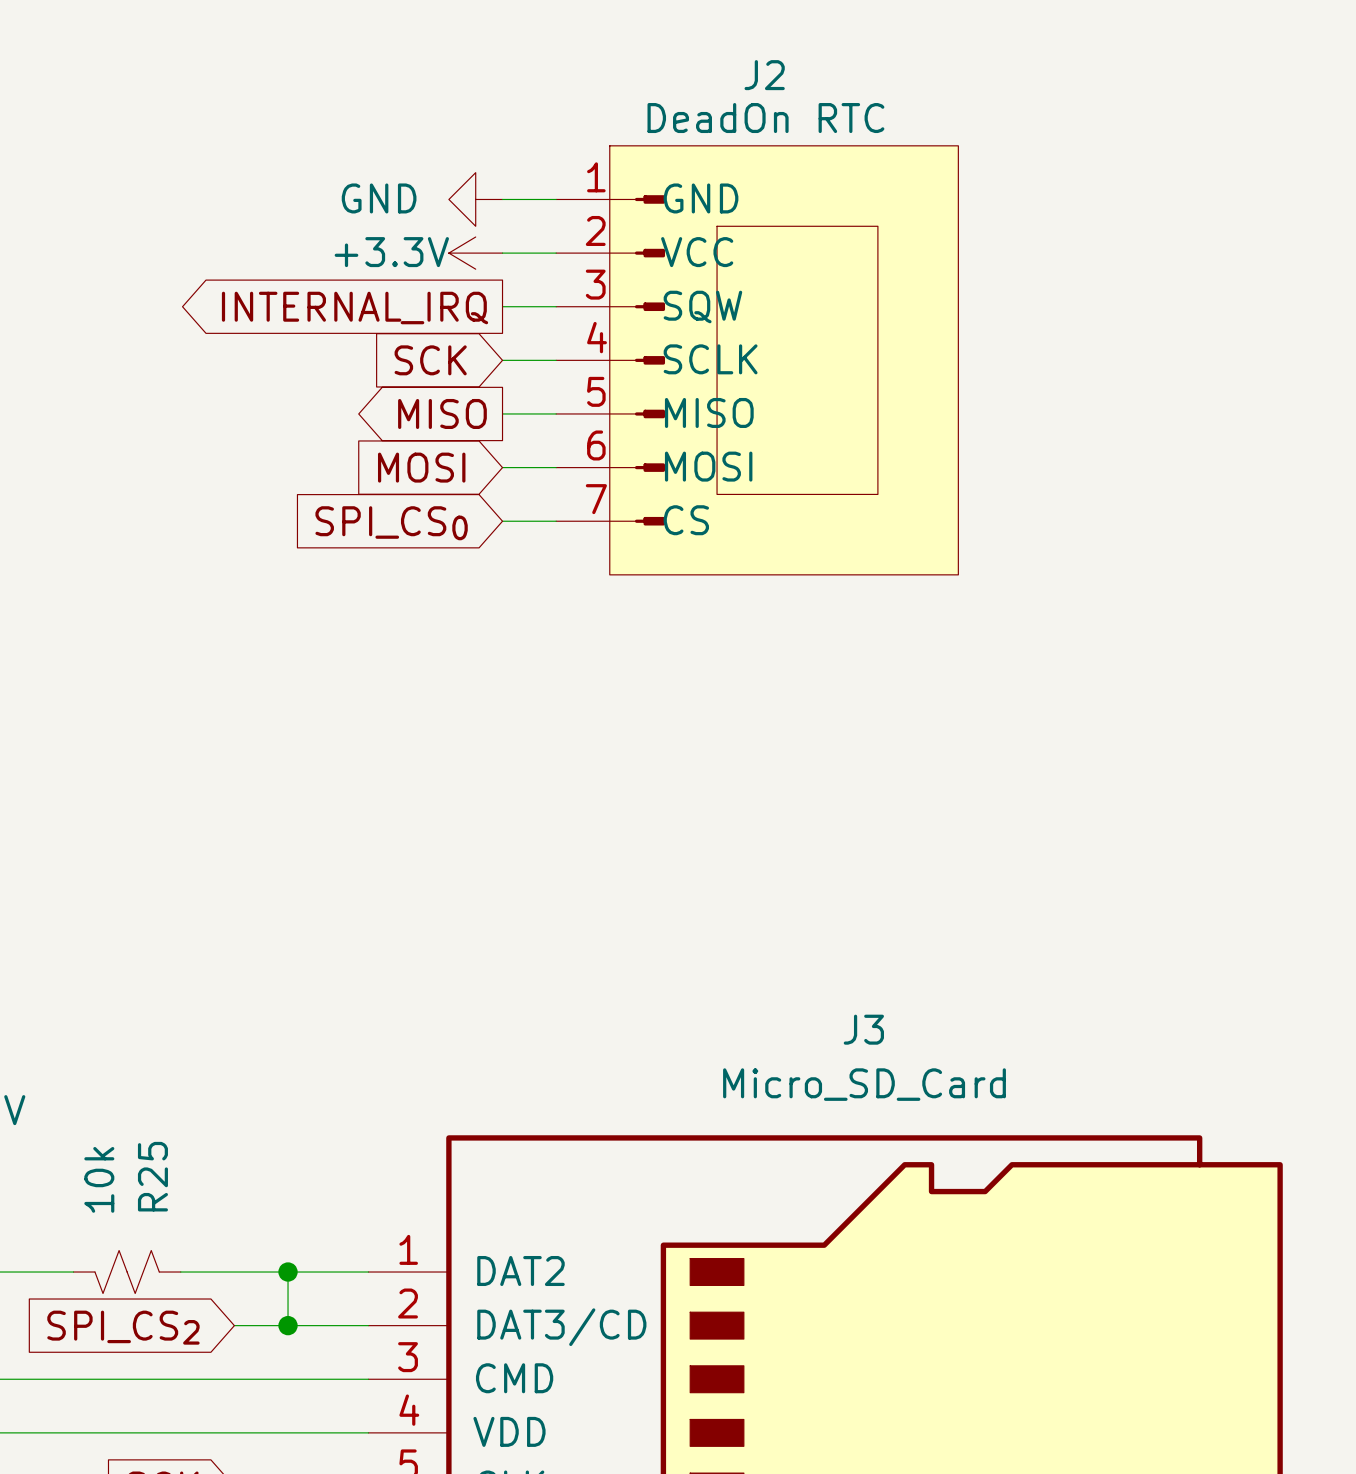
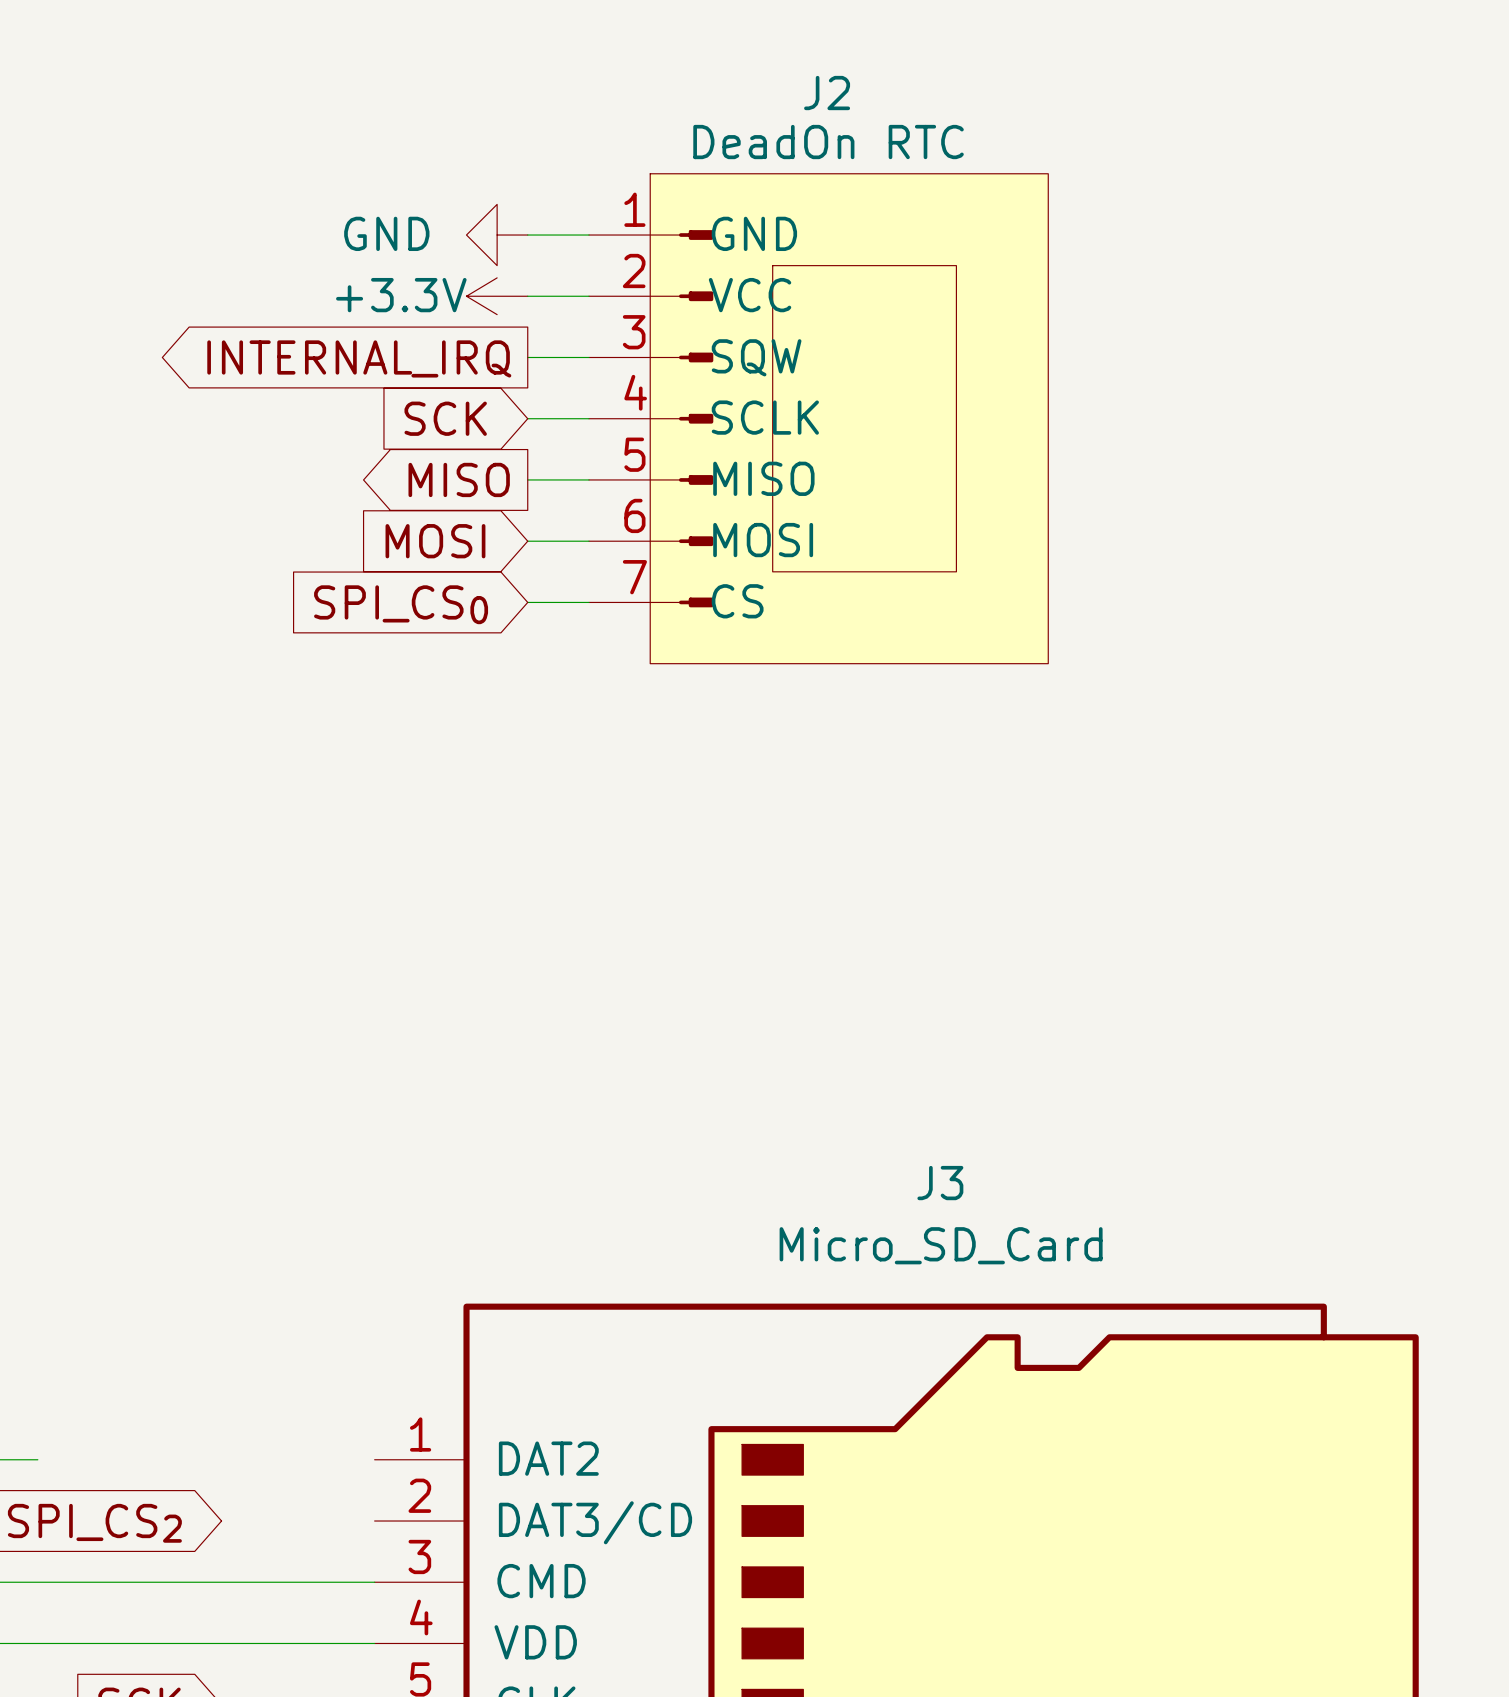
R25: 10k (127, 1272) -> none
wire: (180, 1272) (368, 1272) -> none
wire: (288, 1272) (288, 1325) -> none
junction: (288, 1272) -> none
wire: (234, 1325) (368, 1325) -> none
junction: (288, 1325) -> none

